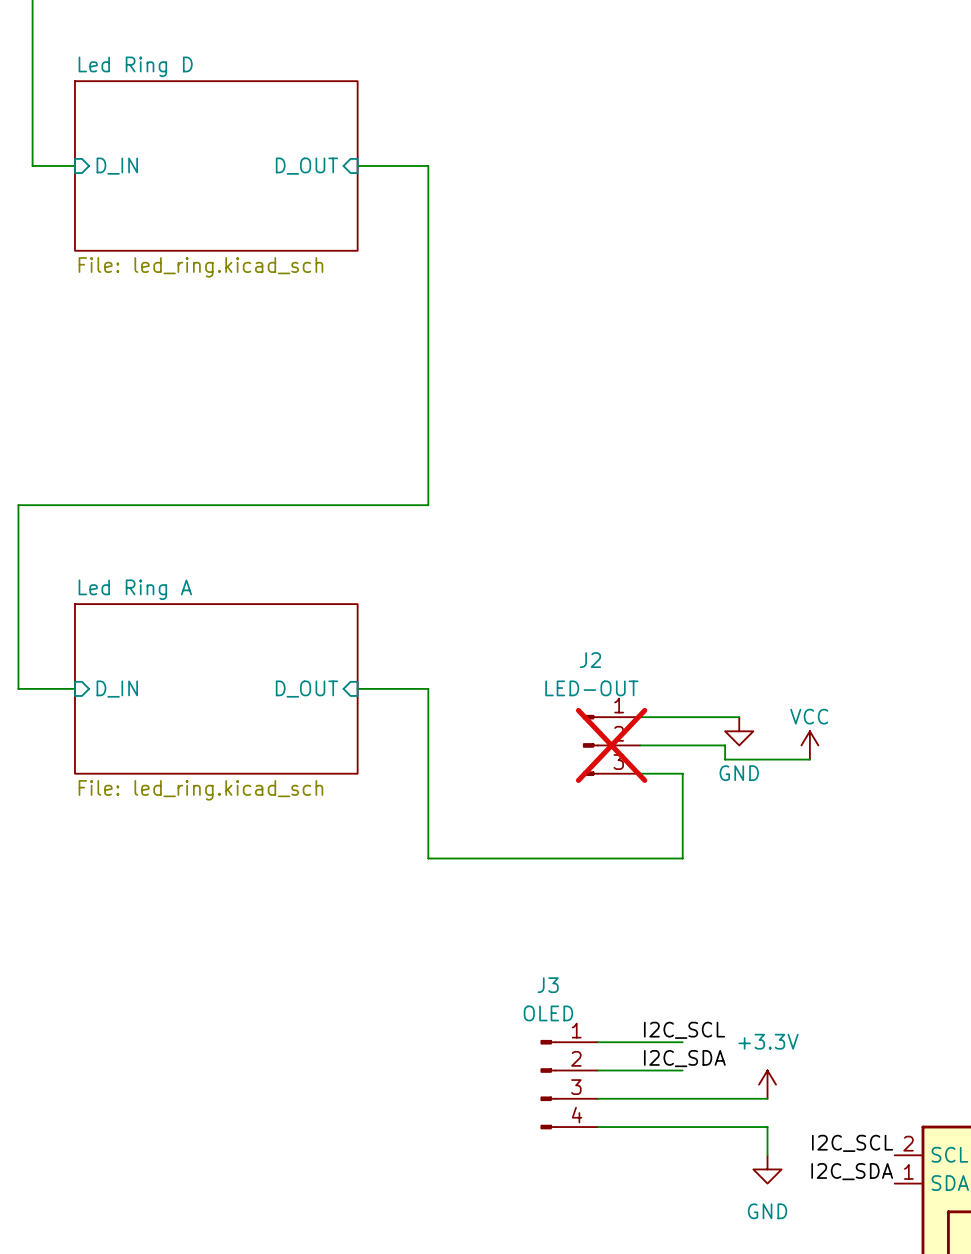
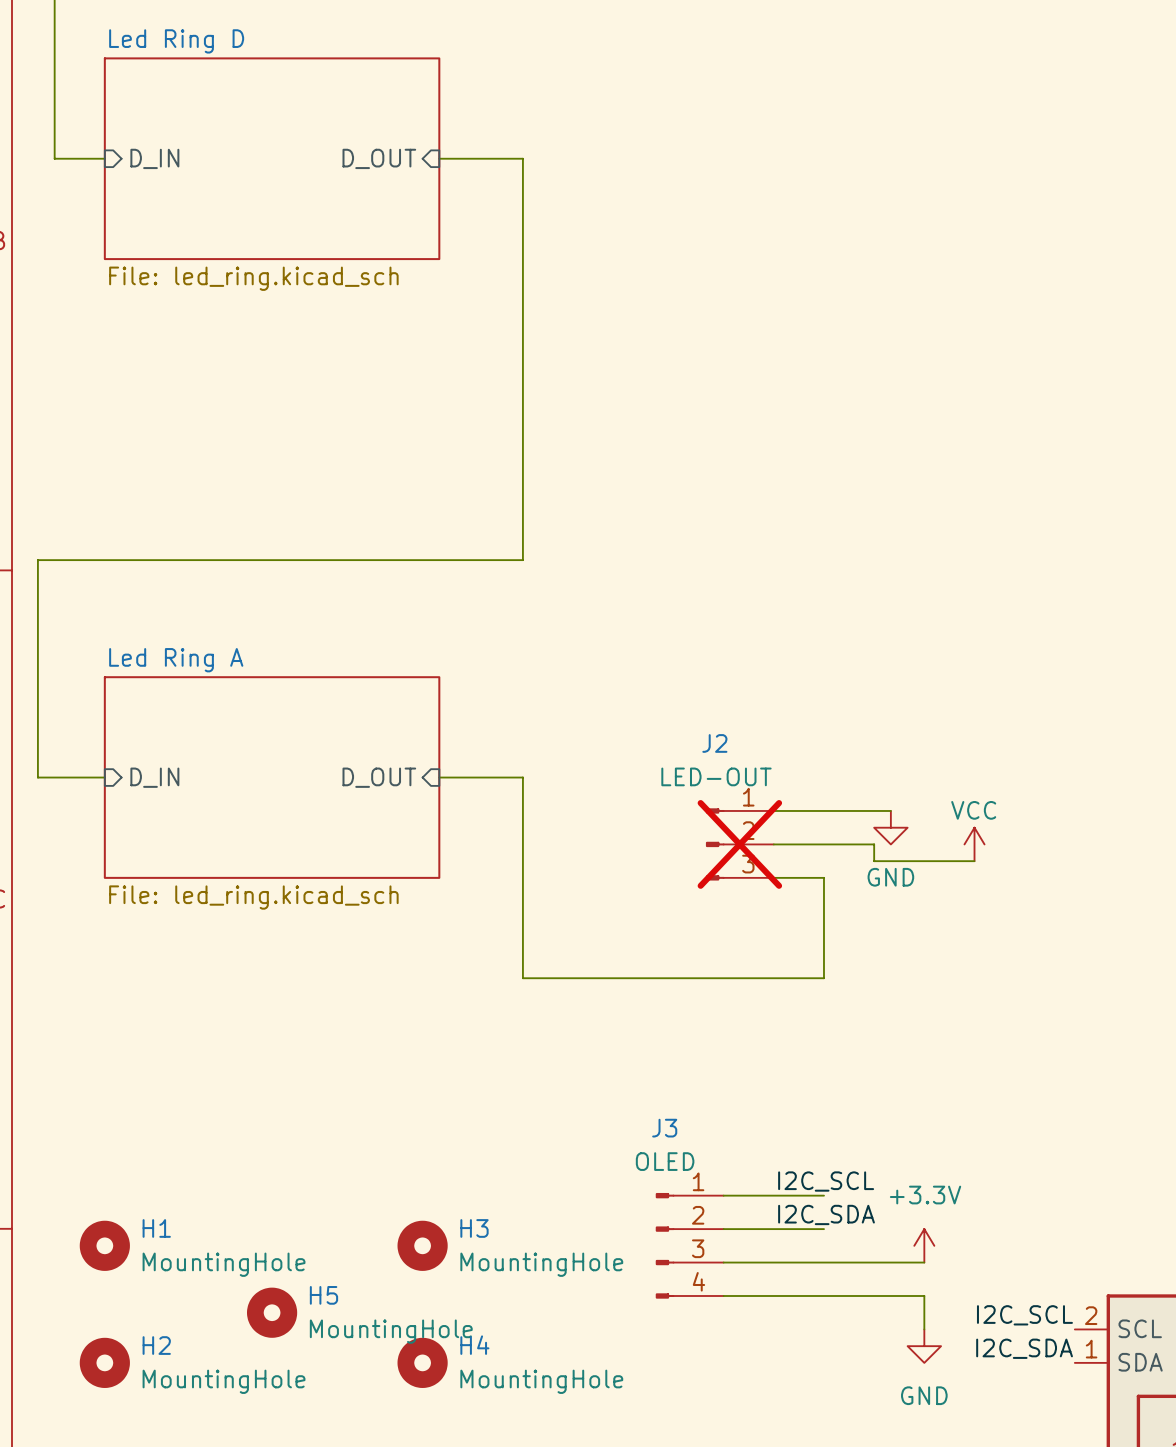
H1: none -> MountingHole (104, 1245)
H3: none -> MountingHole (422, 1245)
H5: none -> MountingHole (272, 1312)
H2: none -> MountingHole (104, 1362)
H4: none -> MountingHole (422, 1362)

